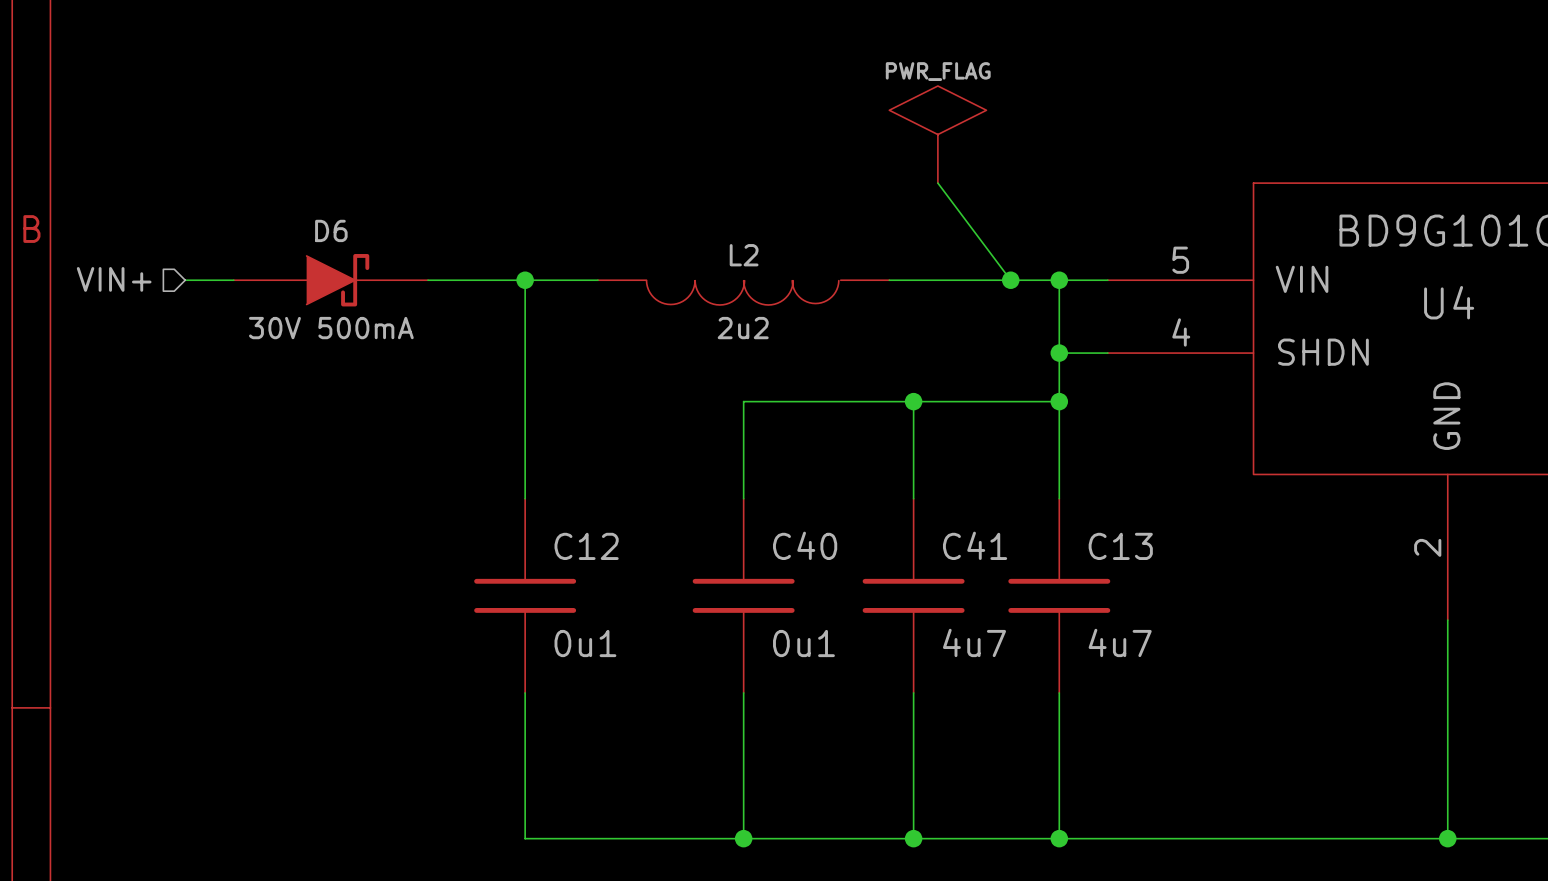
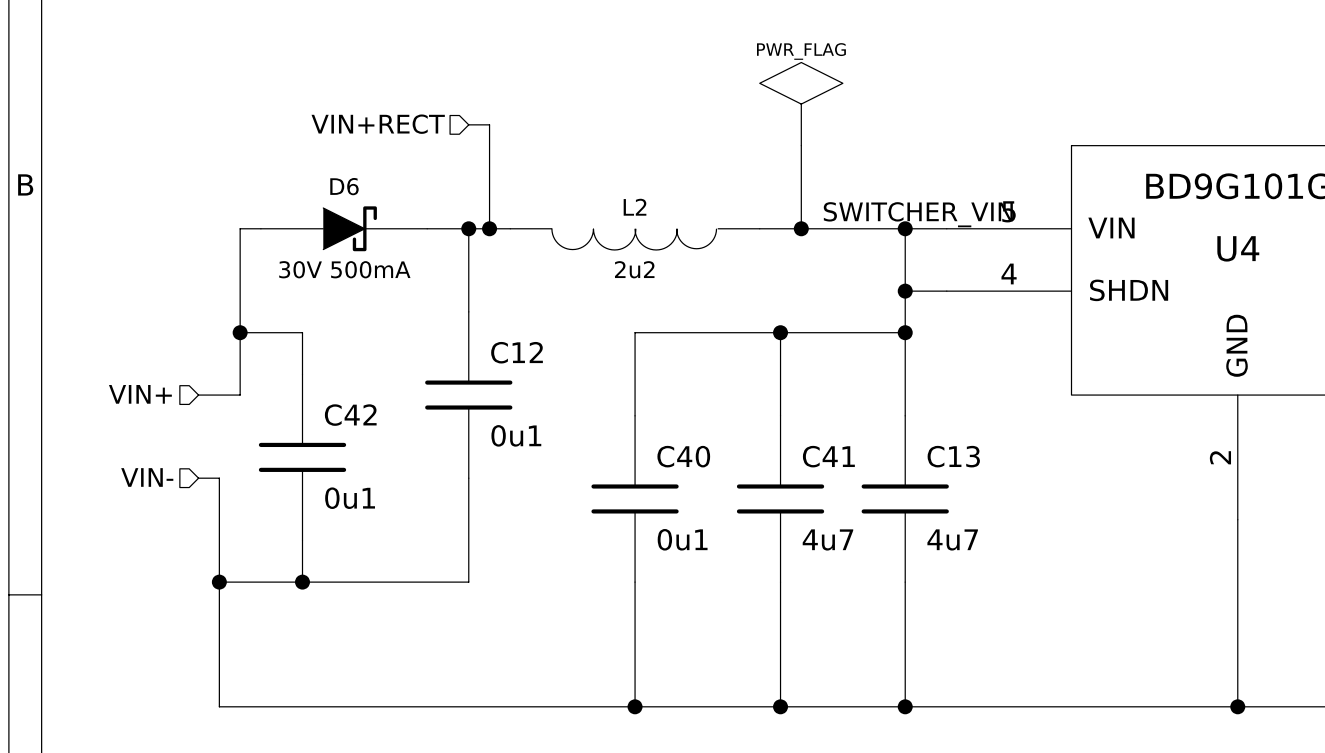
hierarchical label: none -> VIN+RECT (378, 124)
wire: none -> (468, 124) (489, 124) (489, 228)
wire: (937, 183) (1010, 280) -> (801, 145) (801, 228)
label: none -> SWITCHER_VIN (918, 214)
hierarchical label position: VIN+ (114, 279) -> VIN+ (140, 394)
wire: (185, 280) (233, 280) -> none
wire: none -> (260, 228) (240, 228) (240, 395) (198, 395)
D6 position: (330, 280) -> (344, 228)
wire: (525, 280) (525, 498) -> none
junction: (525, 280) -> none
wire: none -> (468, 228) (468, 311)
junction: none -> (468, 228)
junction: none -> (489, 228)
junction position: (1010, 280) -> (801, 228)
wire: none -> (240, 332) (302, 332) (302, 374)
junction: none -> (240, 332)
C42: none -> 0u1 (302, 457)
hierarchical label: none -> VIN- (147, 477)
wire: none -> (468, 478) (468, 582) (219, 582)
C12 position: (525, 595) -> (468, 395)
wire: none -> (302, 540) (302, 582)
junction: none -> (219, 582)
junction: none -> (302, 582)
wire: (525, 692) (525, 838) -> (198, 478) (219, 478) (219, 706) (447, 706)

